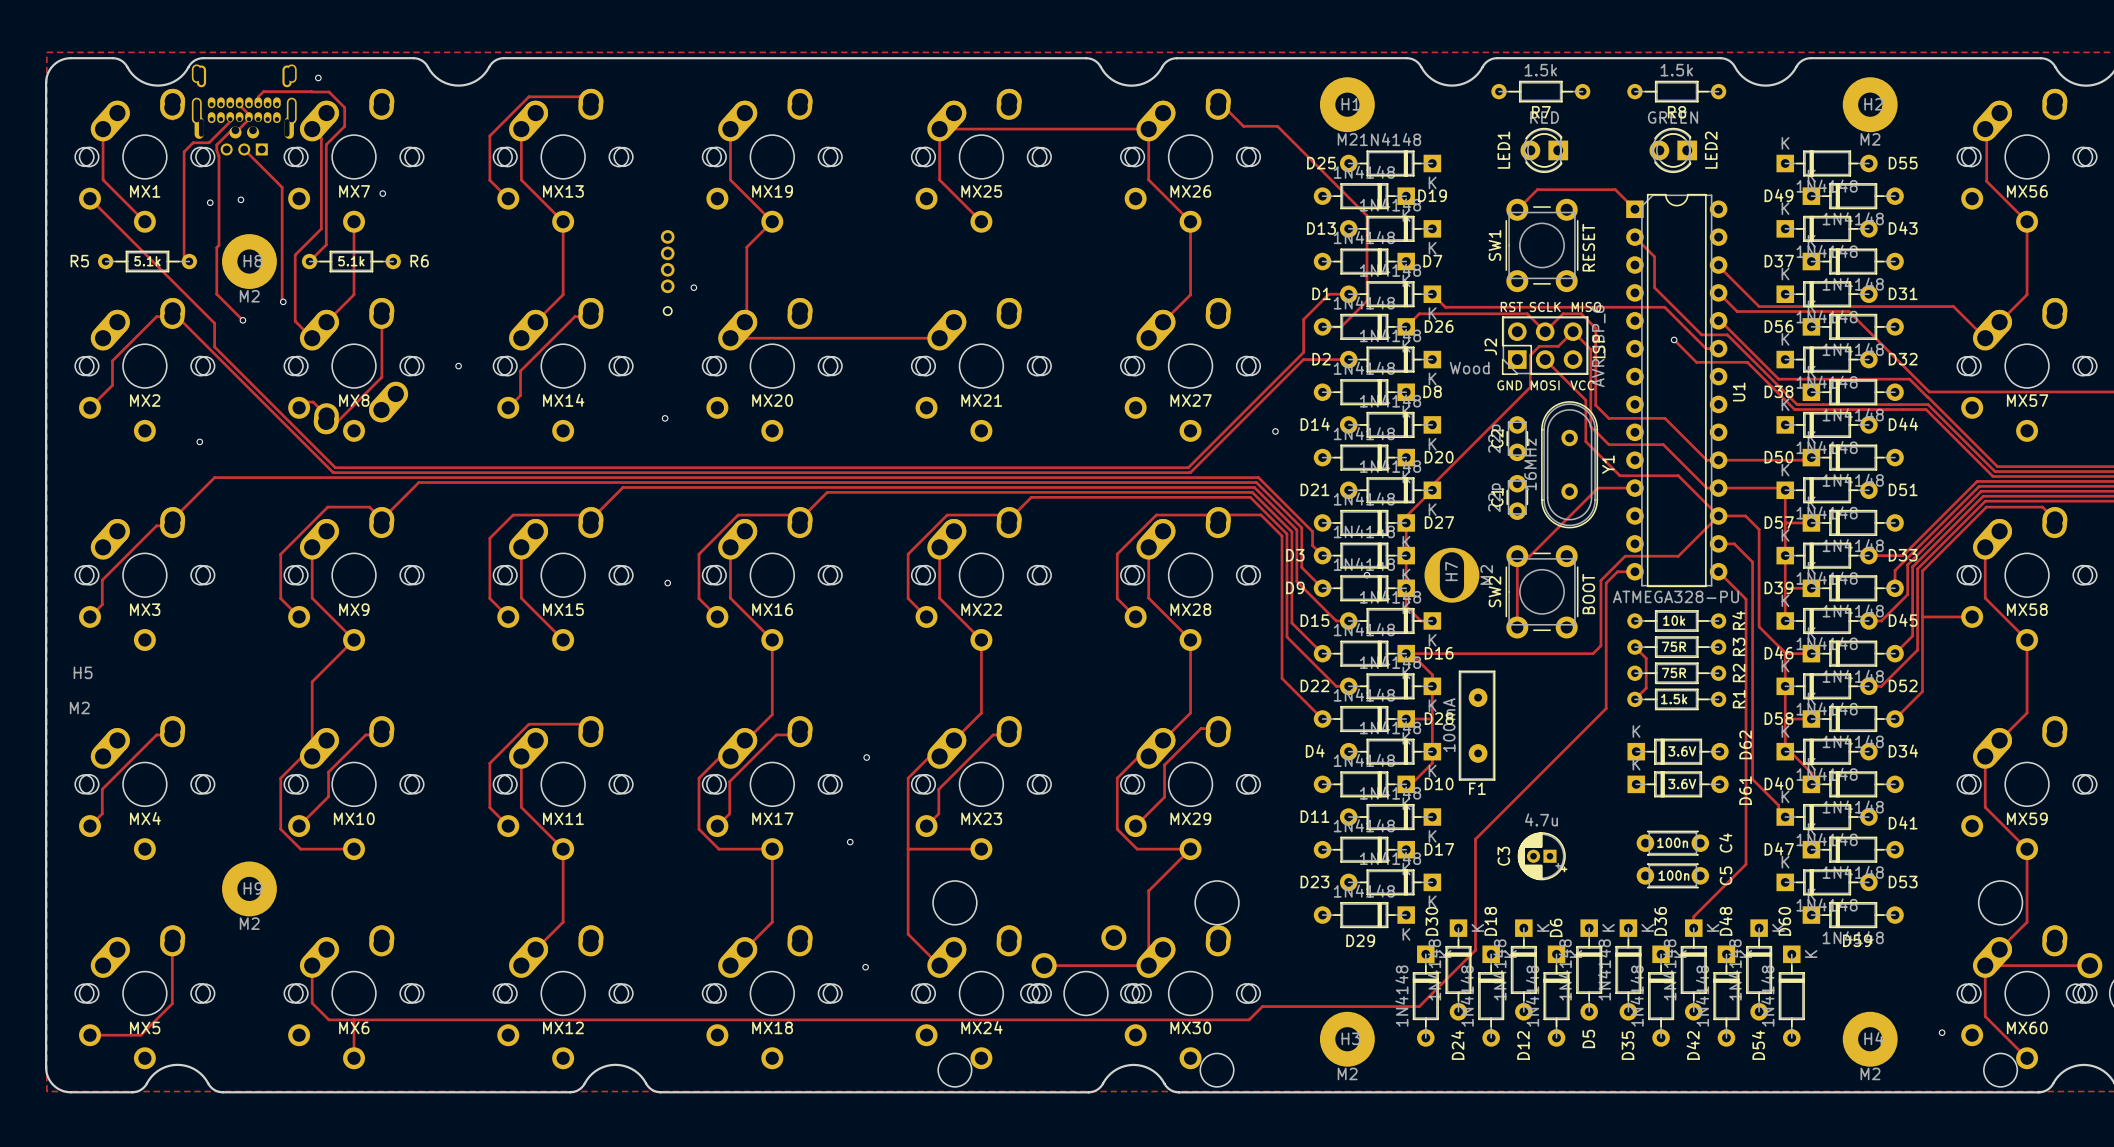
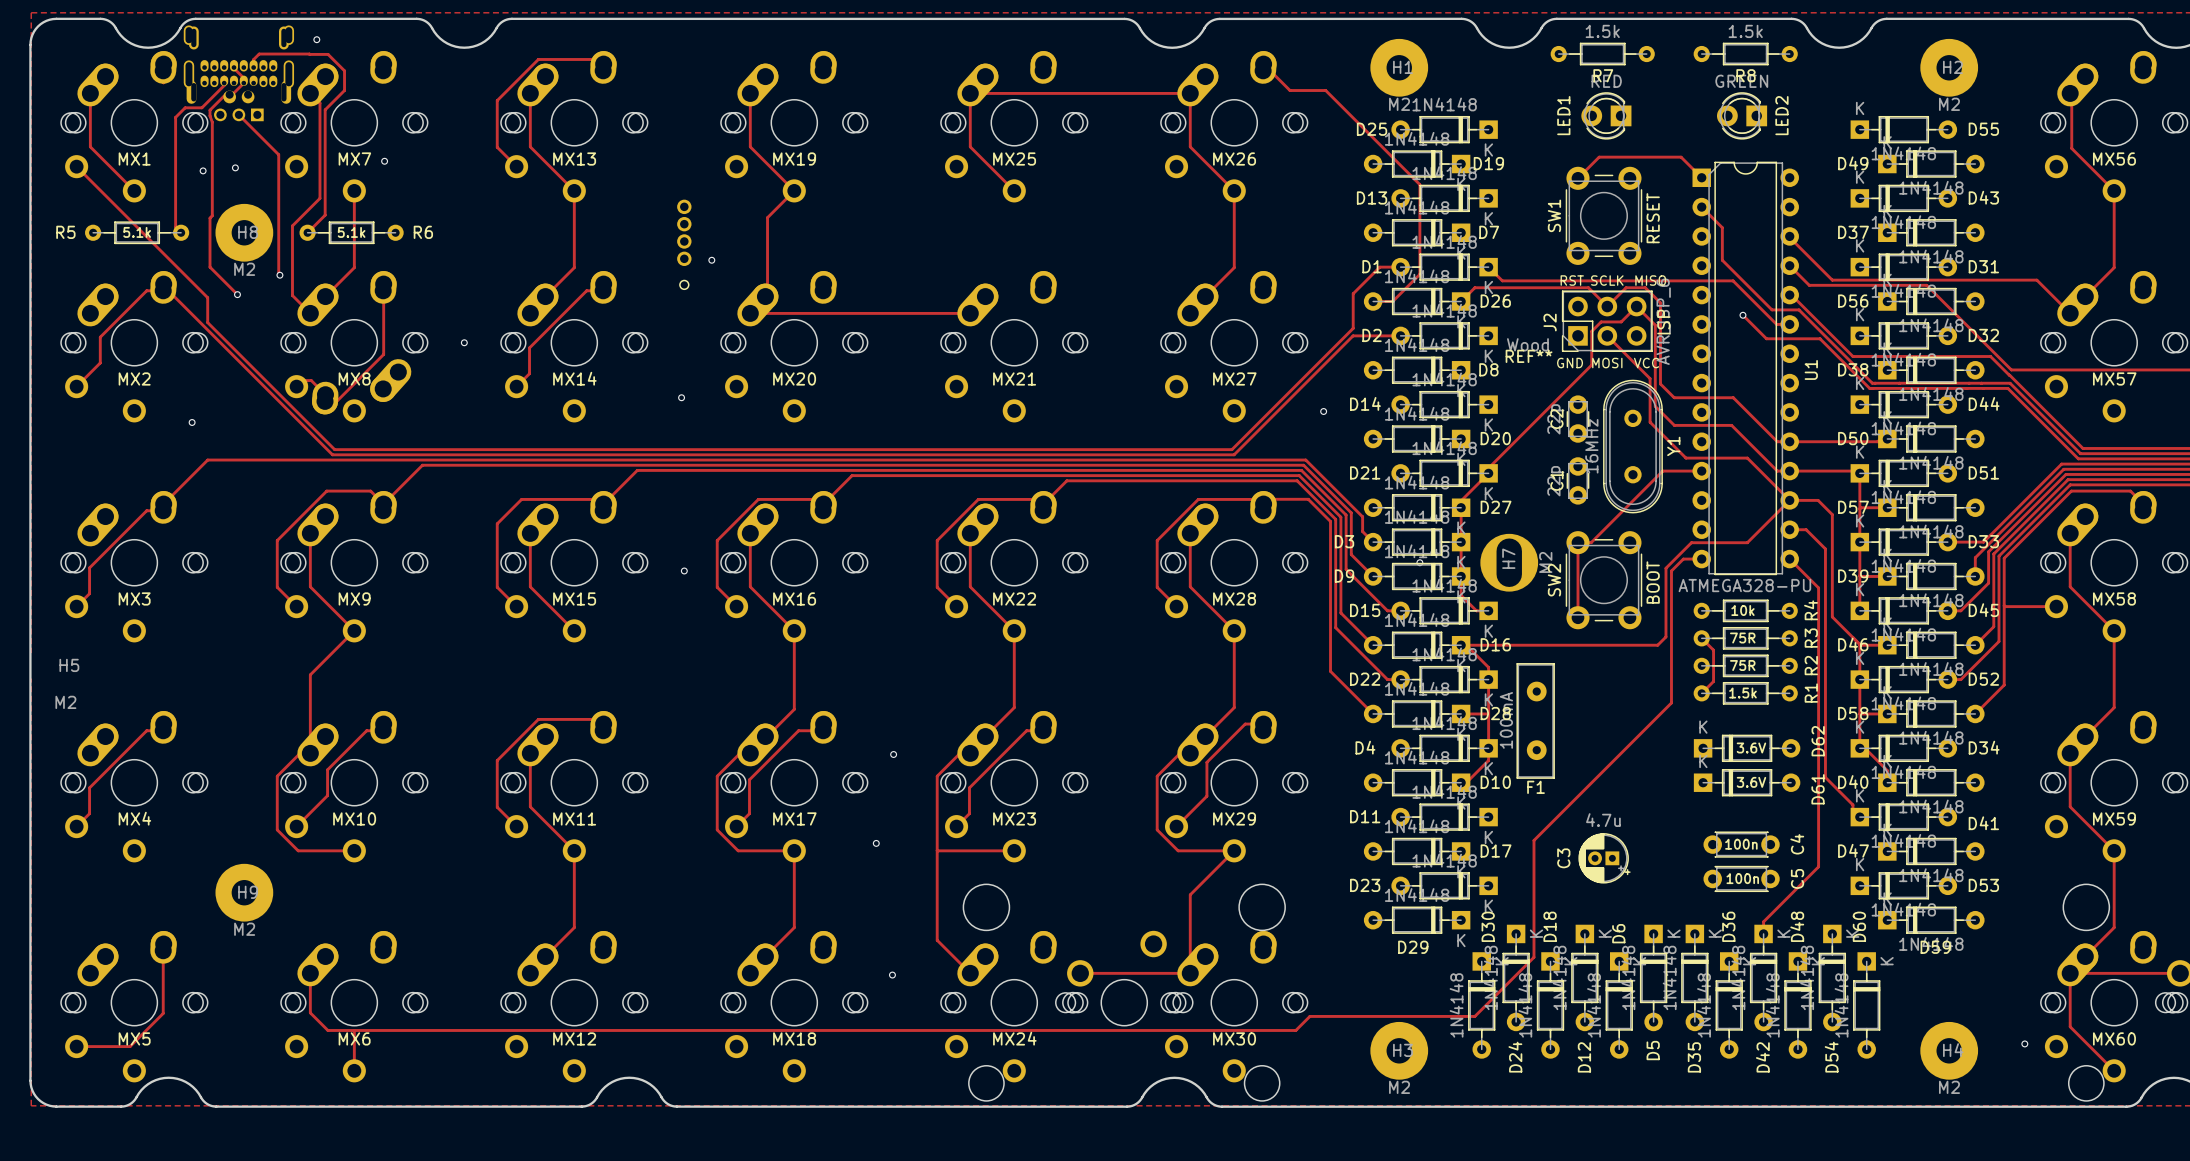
drawing: [1449, 361, 1490, 375] -> none
REF**: none -> Wood (1529, 350)

